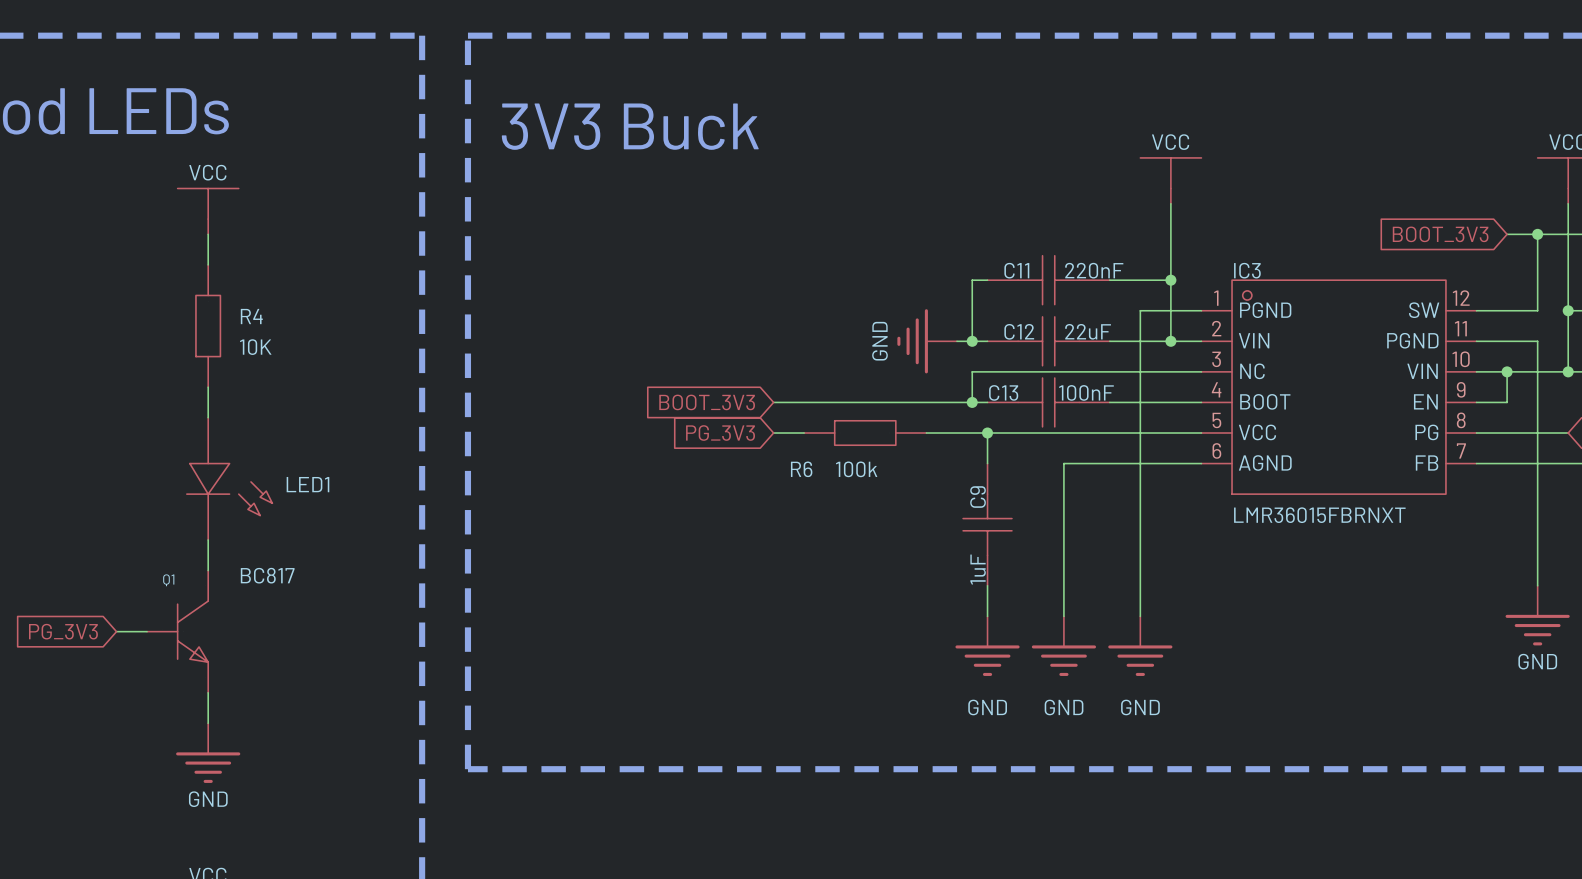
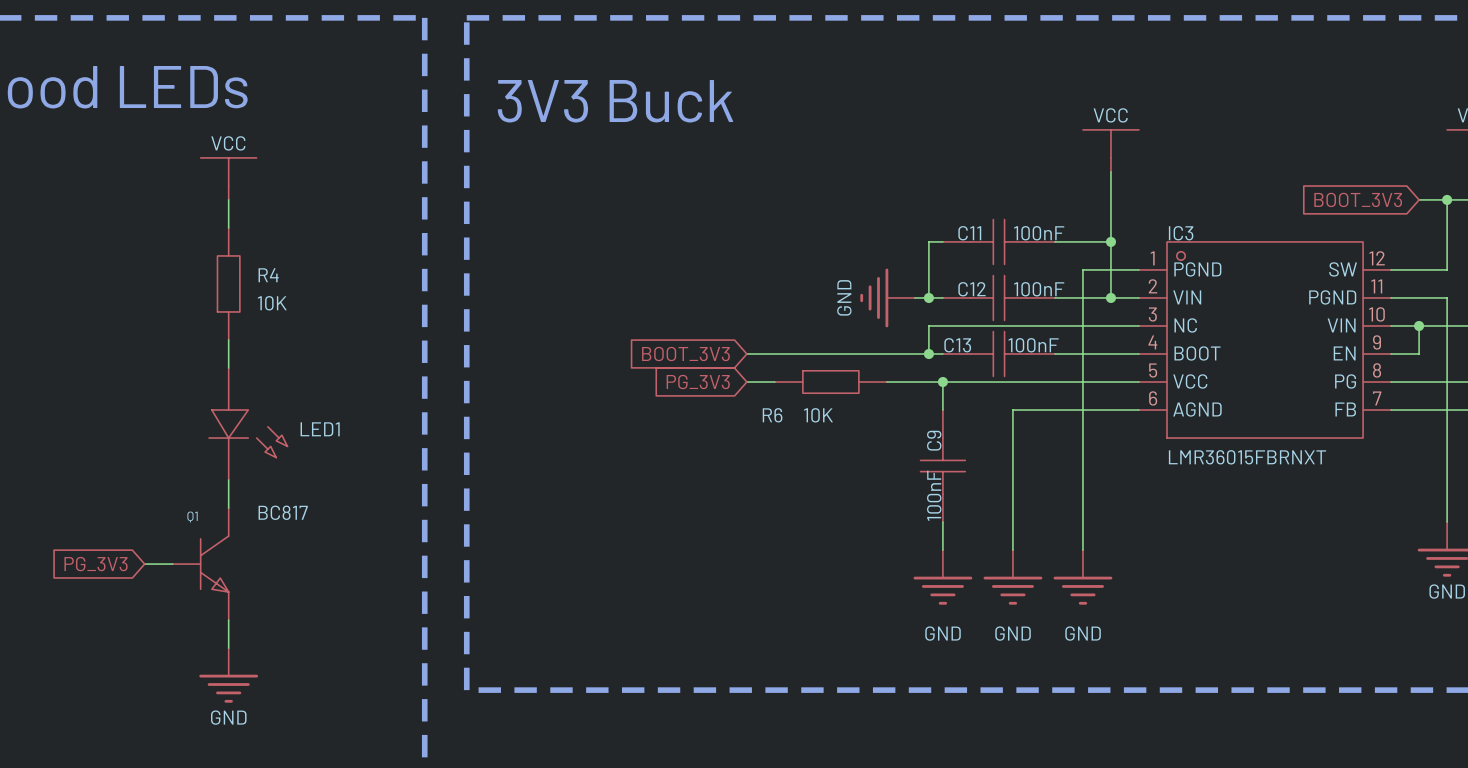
C11 value: 220nF (1094, 270) -> 100nF (1039, 233)
C12 value: 22uF (1088, 331) -> 100nF (1039, 289)
R6 value: 100k (856, 469) -> 10K (818, 415)
C9 value: 1uF (978, 569) -> 100nF (934, 495)

